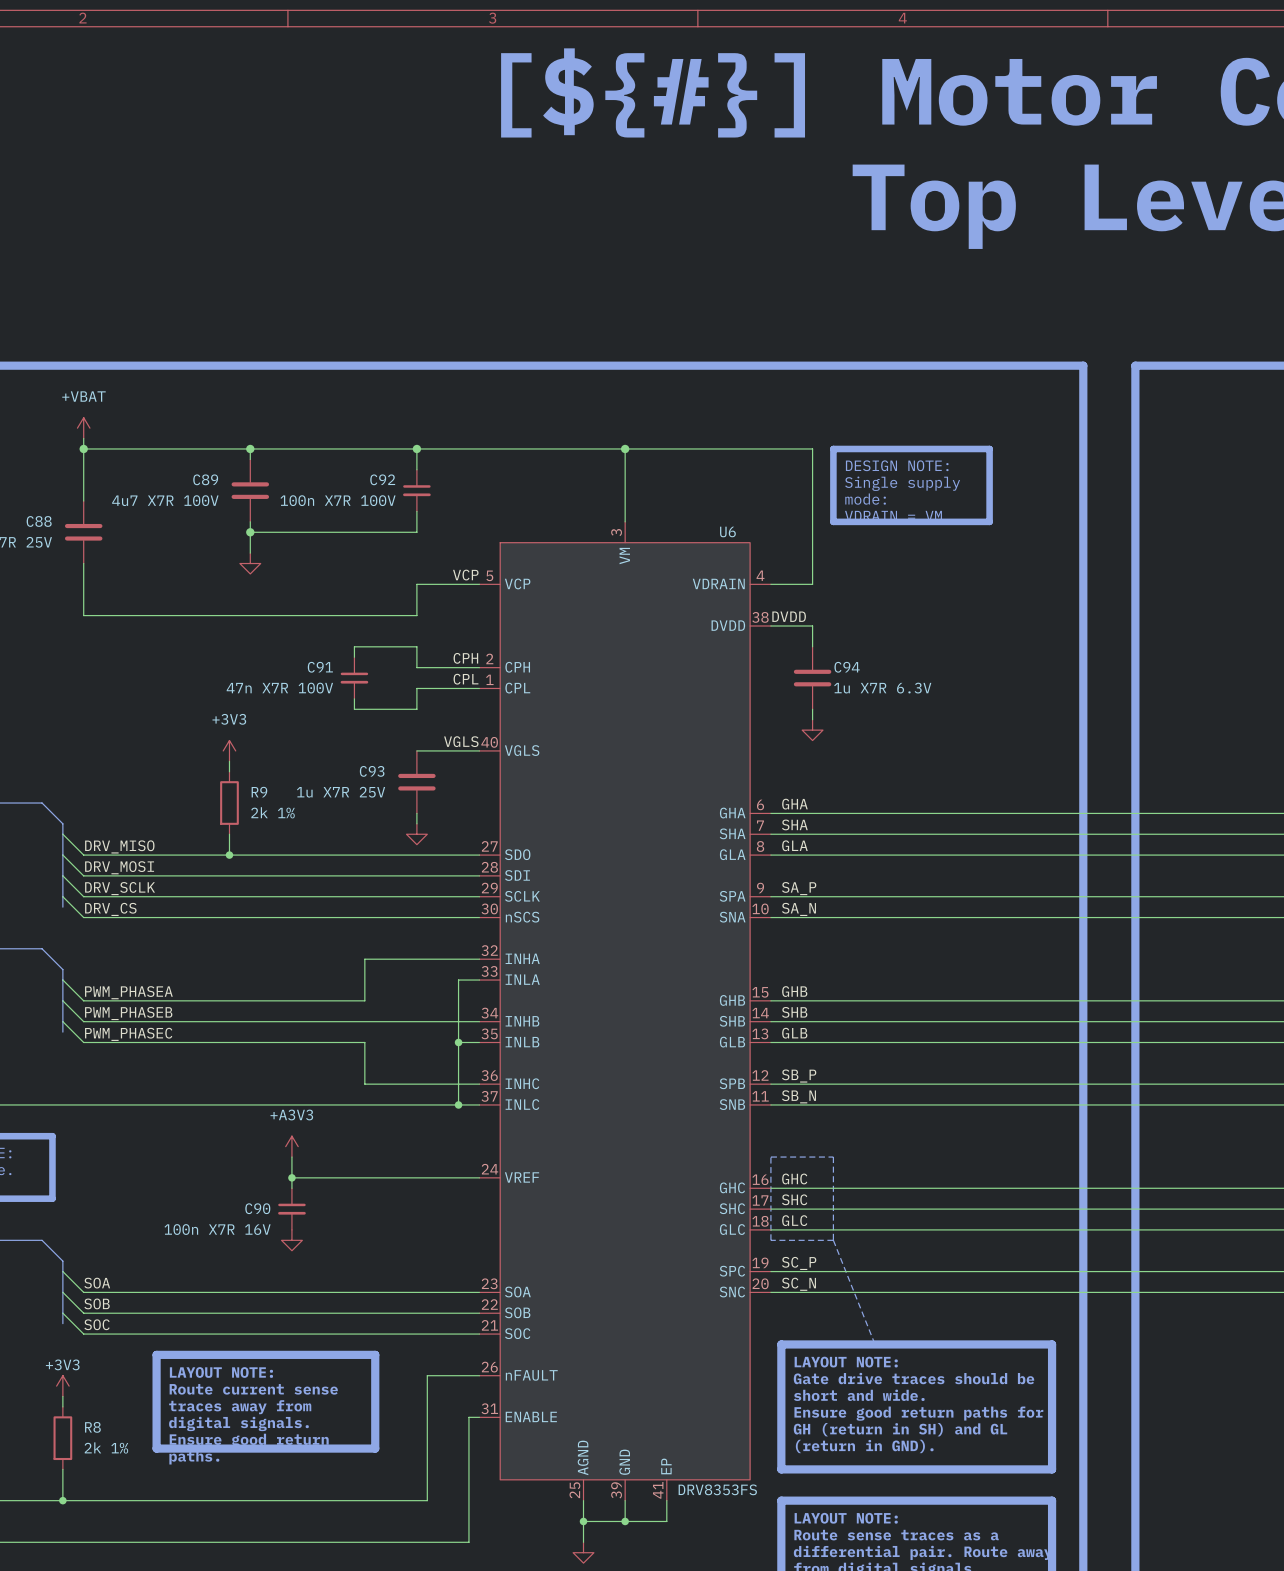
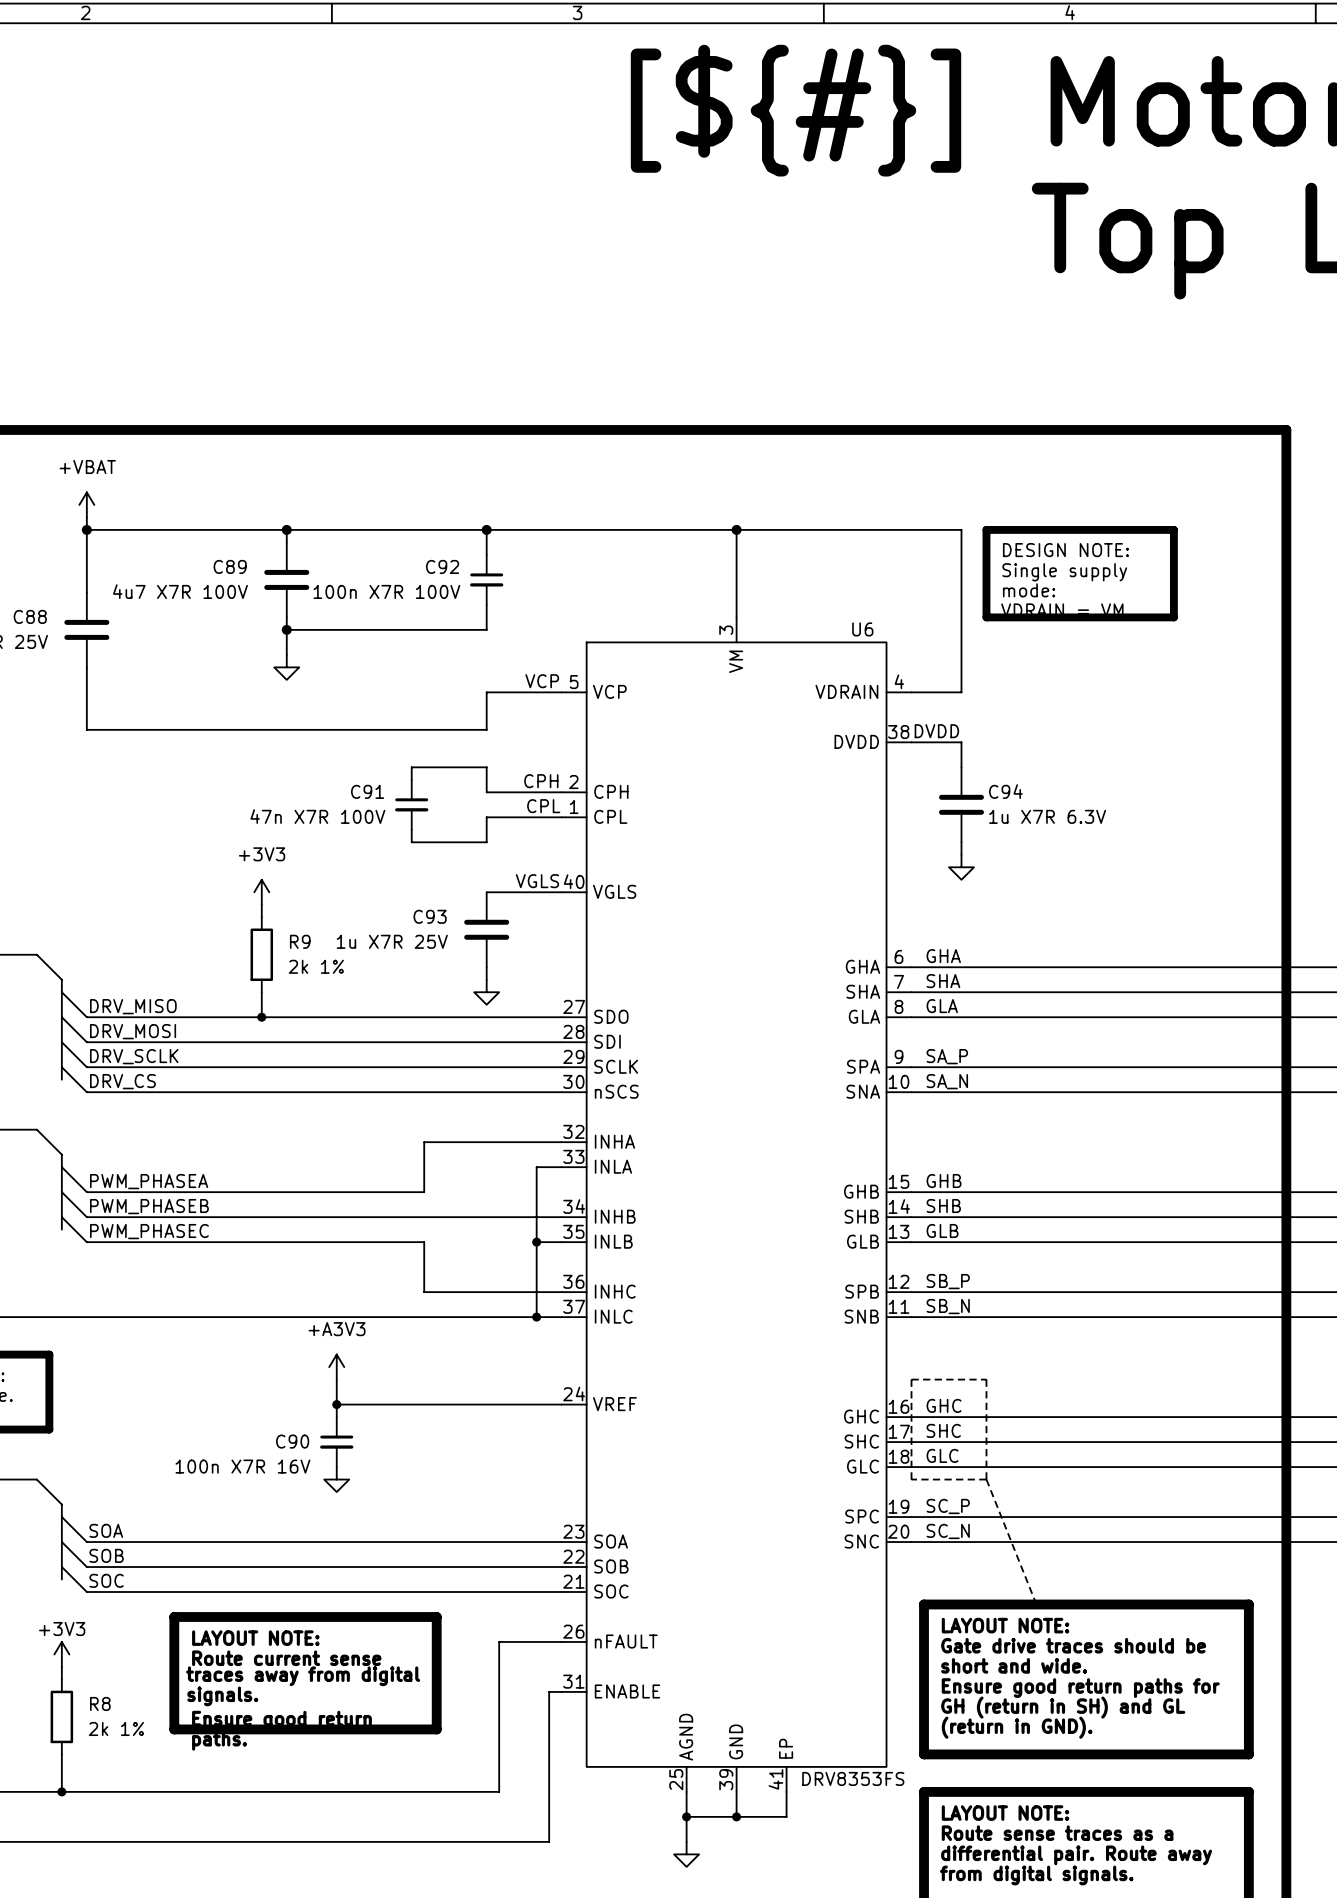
text: traces away from (240, 1407) -> traces away from digital (303, 1676)
text: digital signals. (238, 1423) -> signals. (222, 1696)

